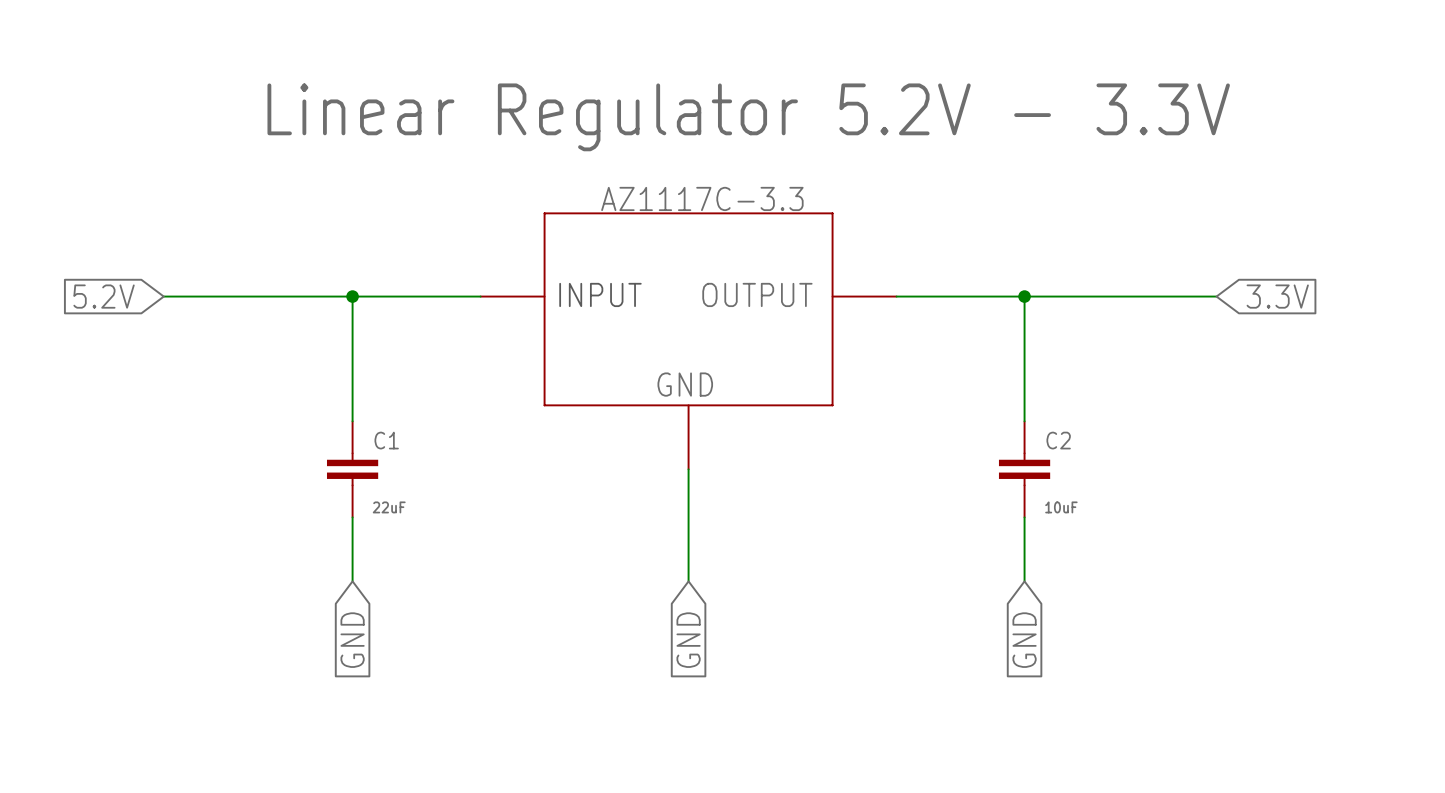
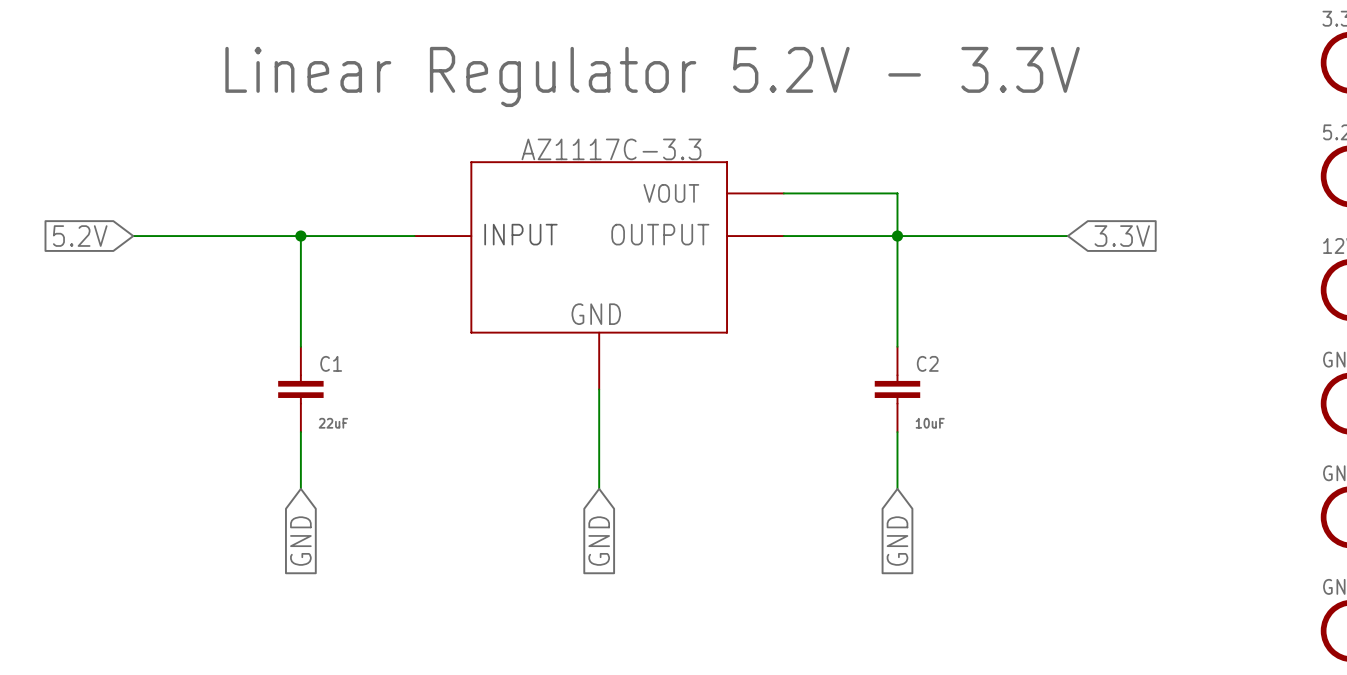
part symbol: [480, 212, 897, 470] -> [414, 161, 784, 390]
wire: none -> (783, 193) (897, 193) (897, 236)

